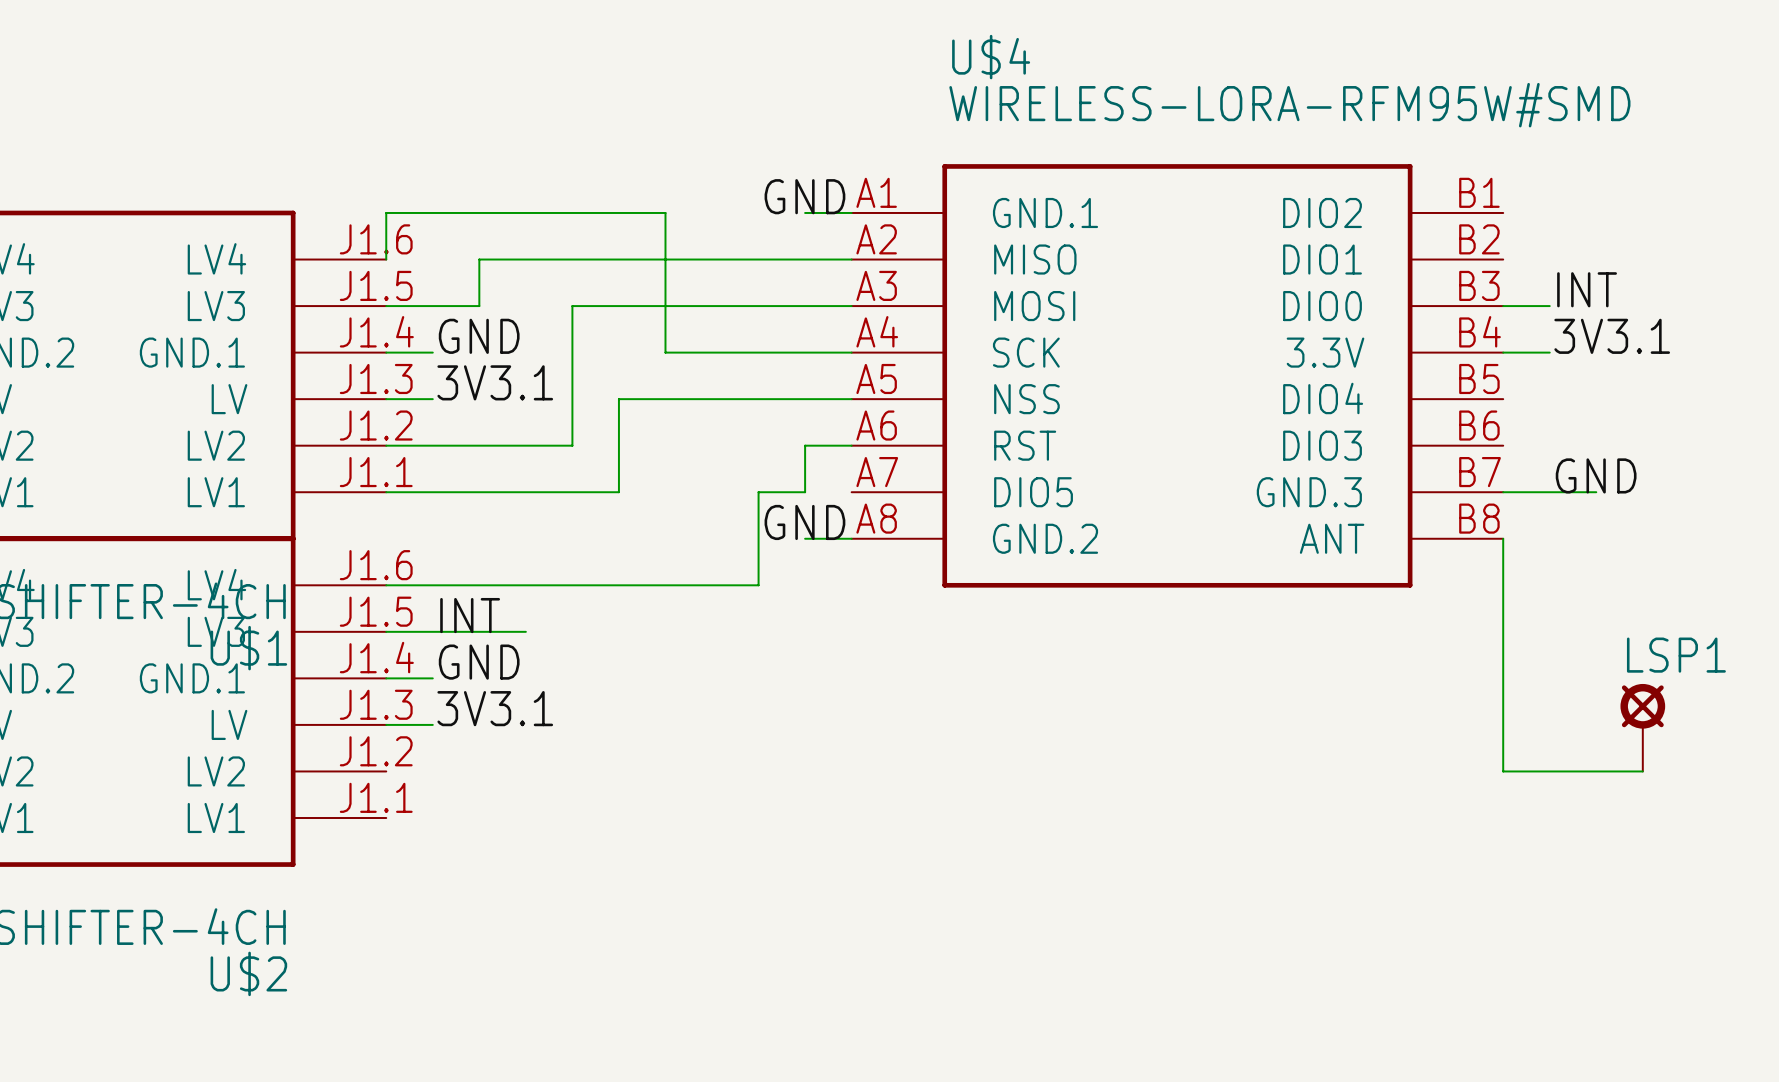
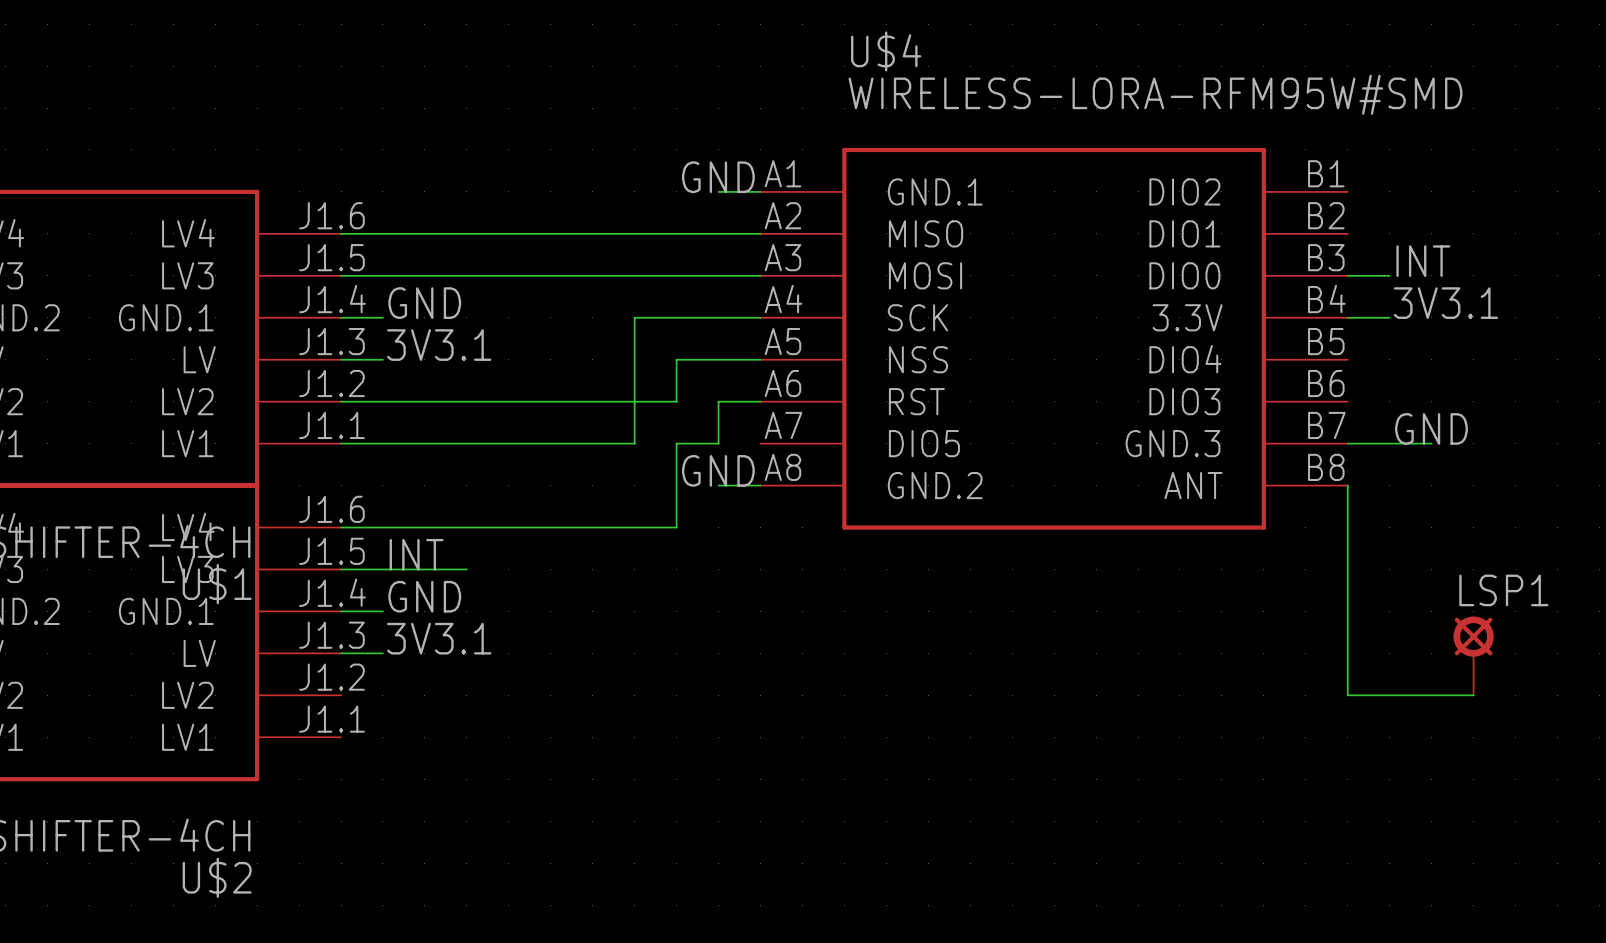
wire: (386, 259) (386, 212) (665, 212) (665, 352) (712, 352) -> (550, 443) (634, 443) (634, 317)
wire: (479, 259) (479, 306) -> (424, 233) (341, 233)
wire: (572, 306) (572, 445) -> (508, 275) (424, 275)
wire: (758, 399) (618, 399) (618, 492) -> (676, 359) (676, 401) (508, 401)

